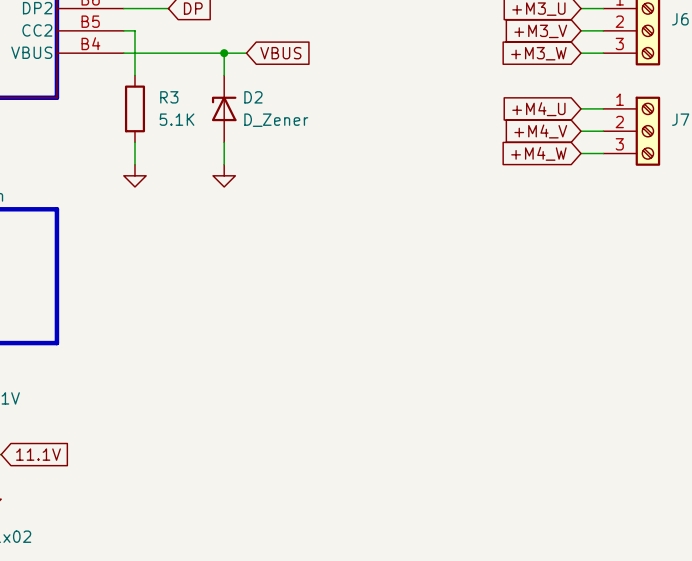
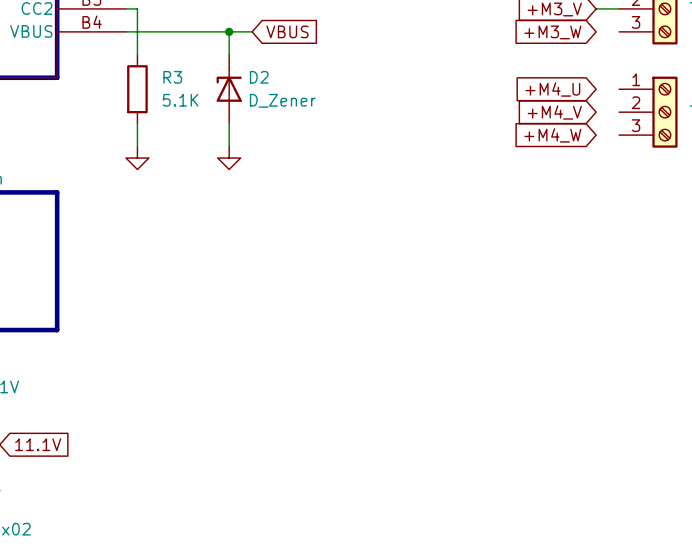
wire: (581, 53) (603, 53) -> none
wire: (581, 108) (603, 108) -> none
wire: (581, 131) (603, 131) -> none
wire: (581, 153) (603, 153) -> none

